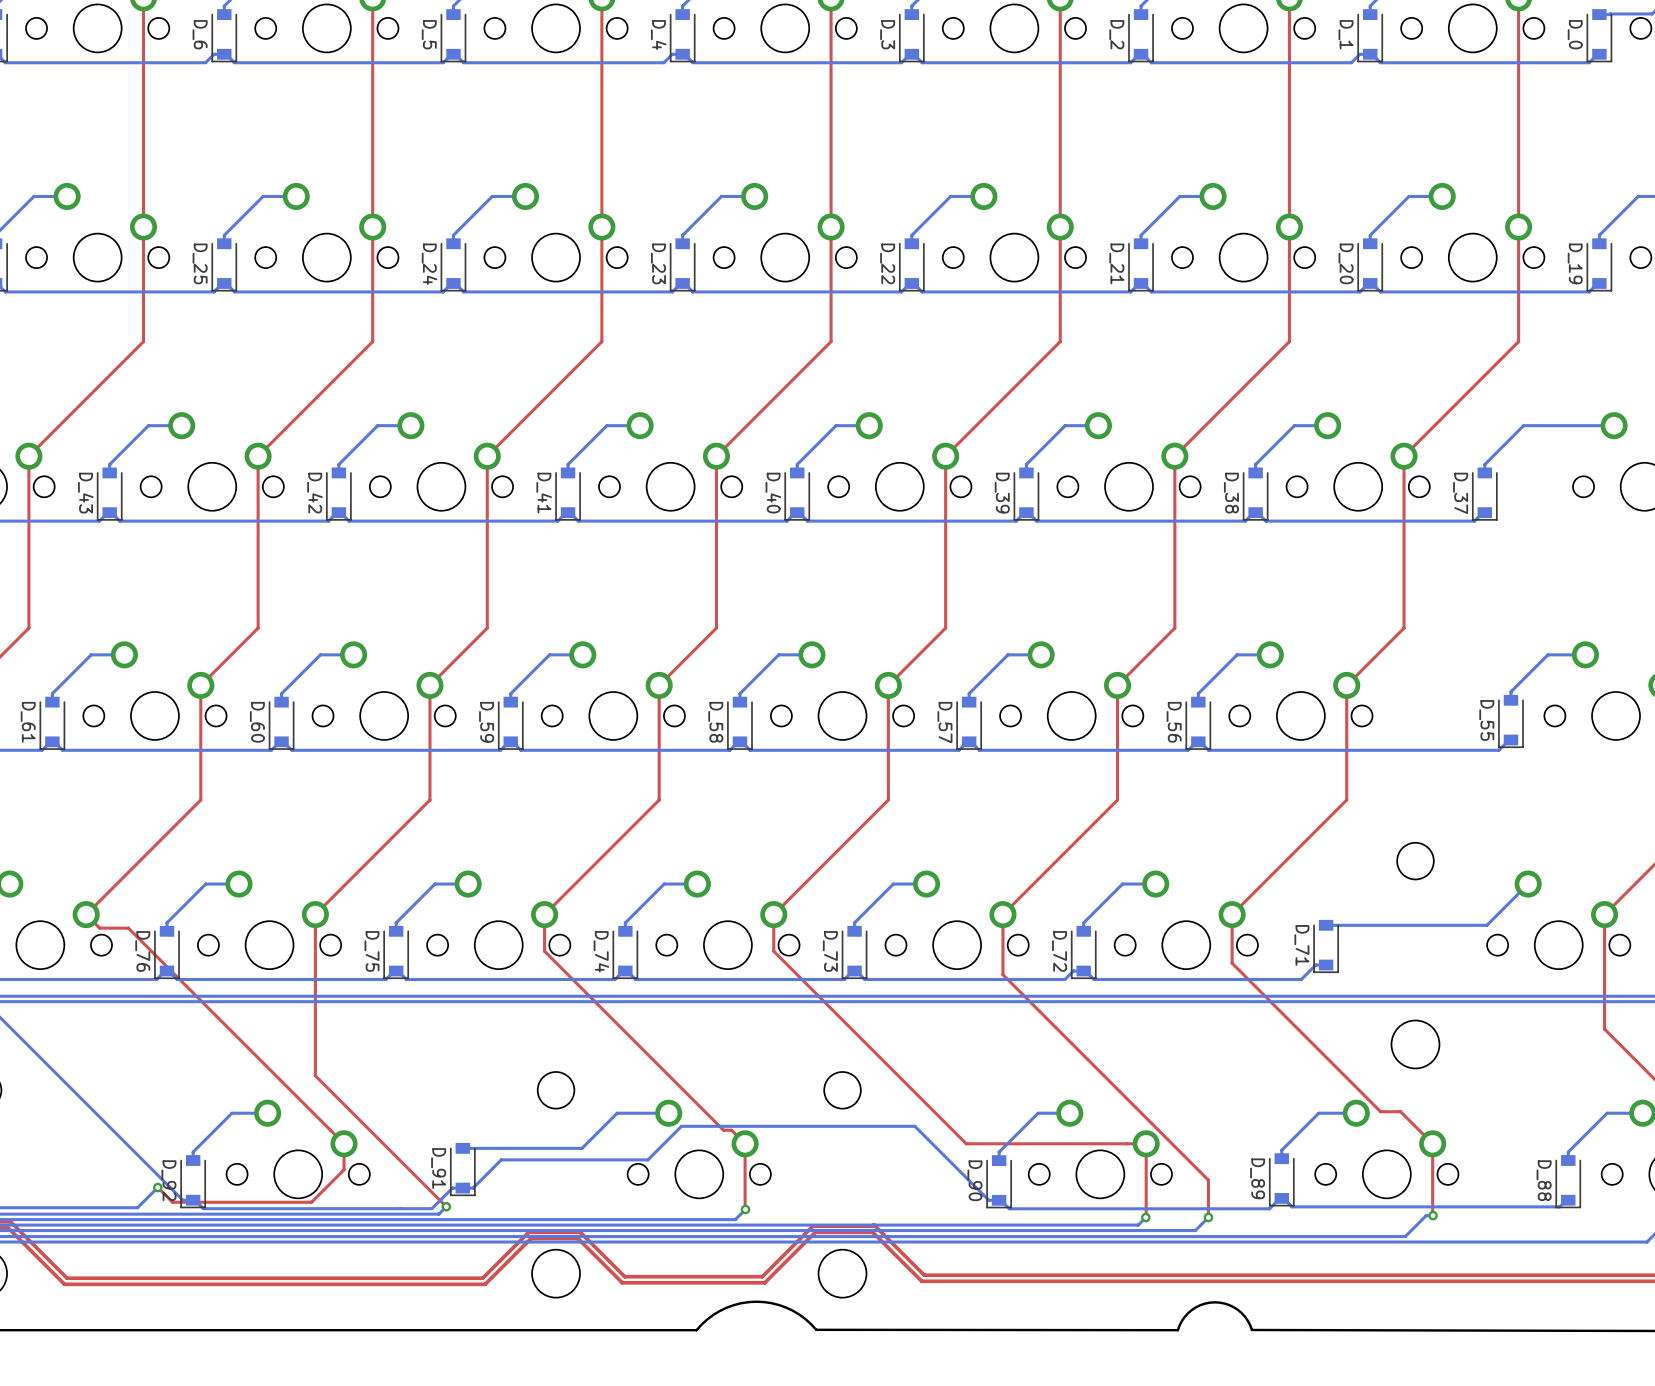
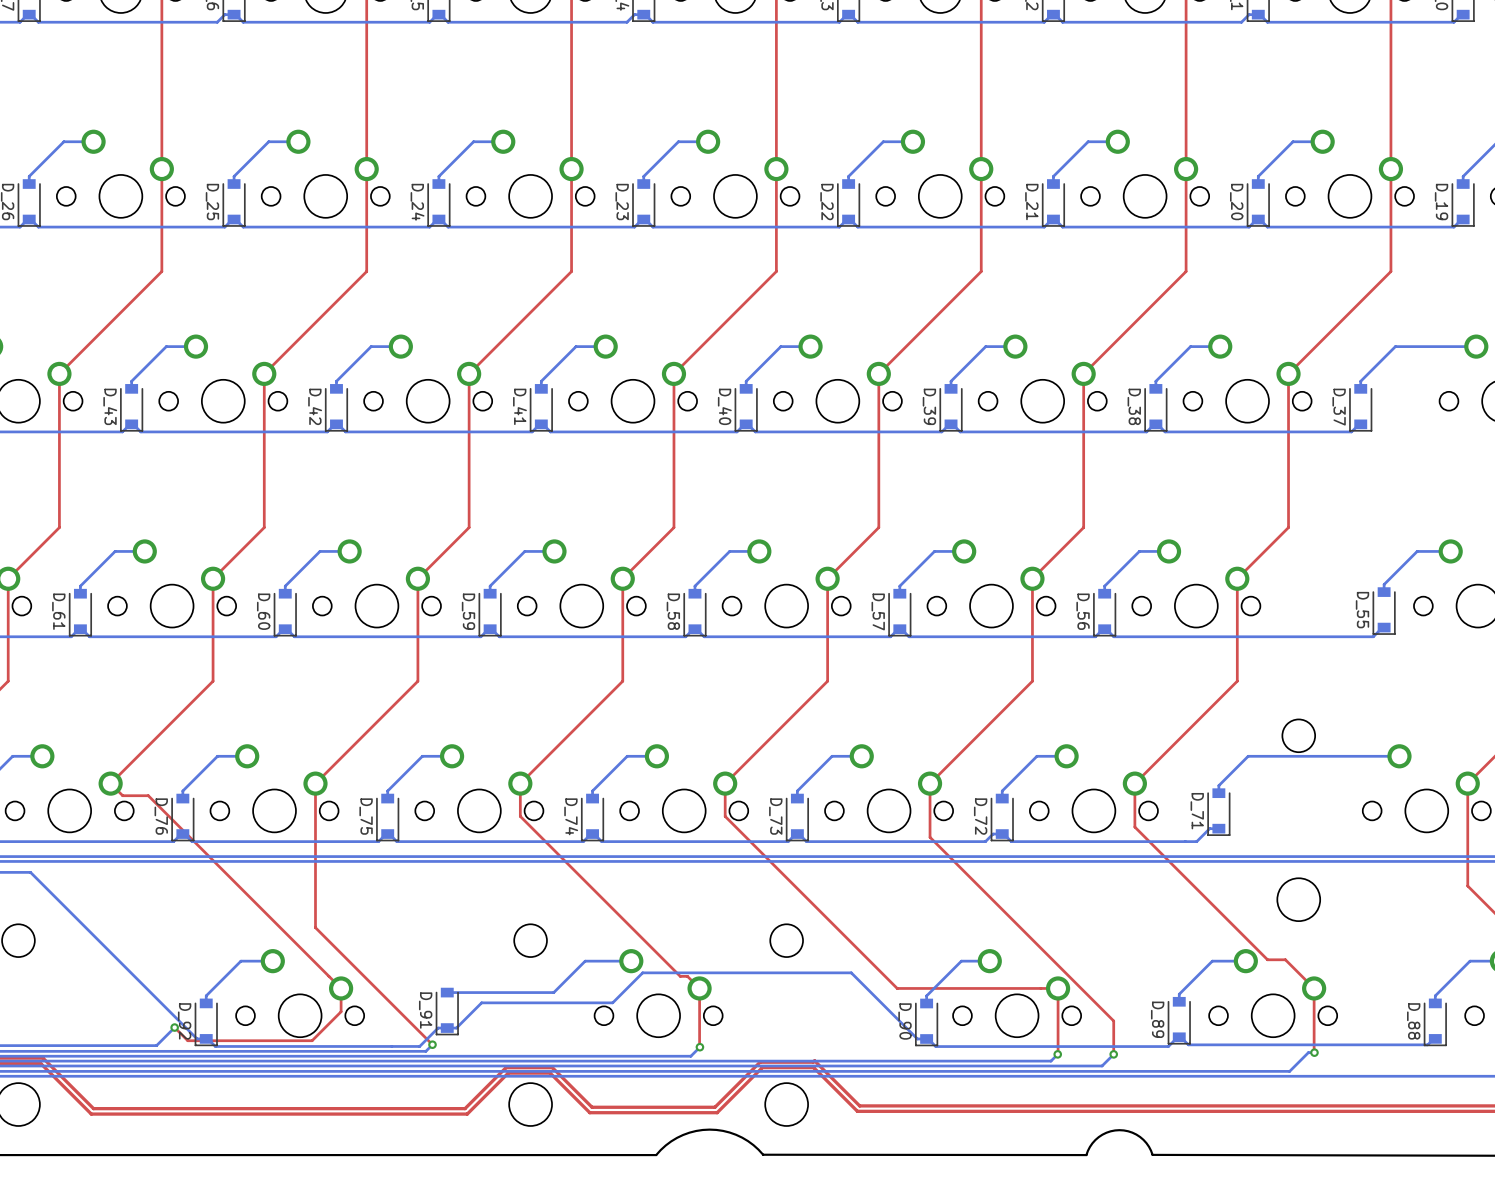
bottom track: (1528, 884) (1486, 925) (1326, 925) -> (1399, 756) (1248, 756) (1218, 785) (1218, 793)

